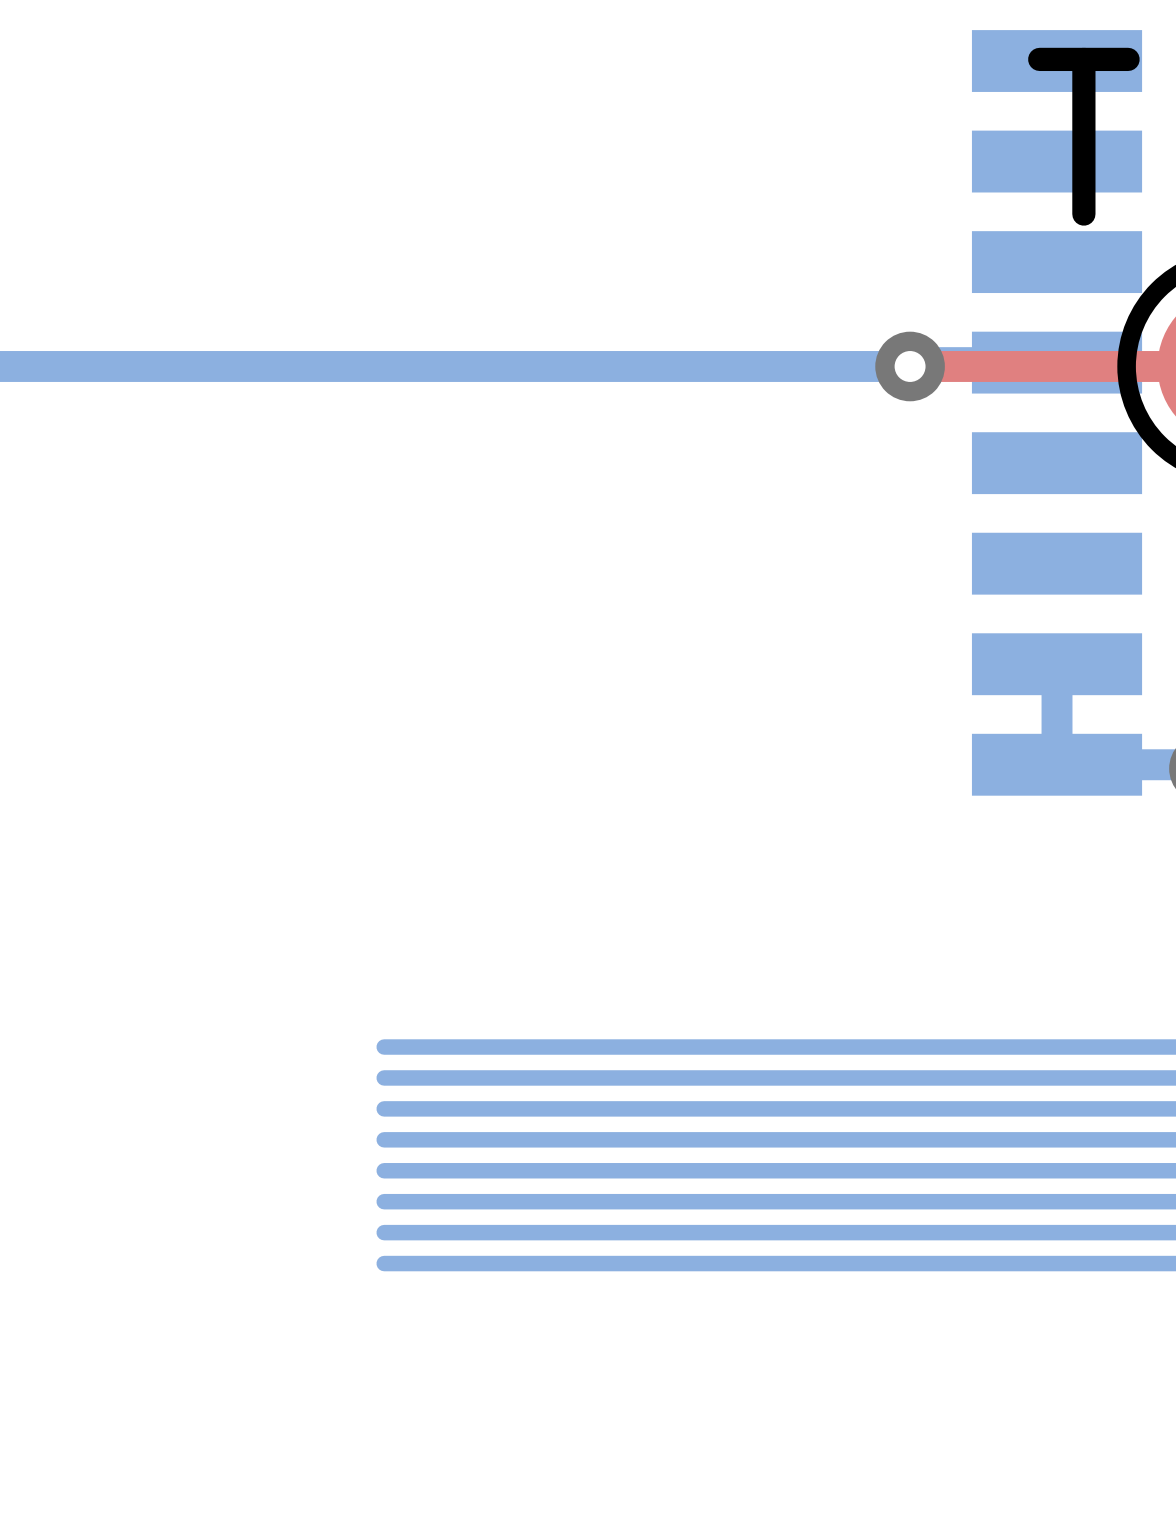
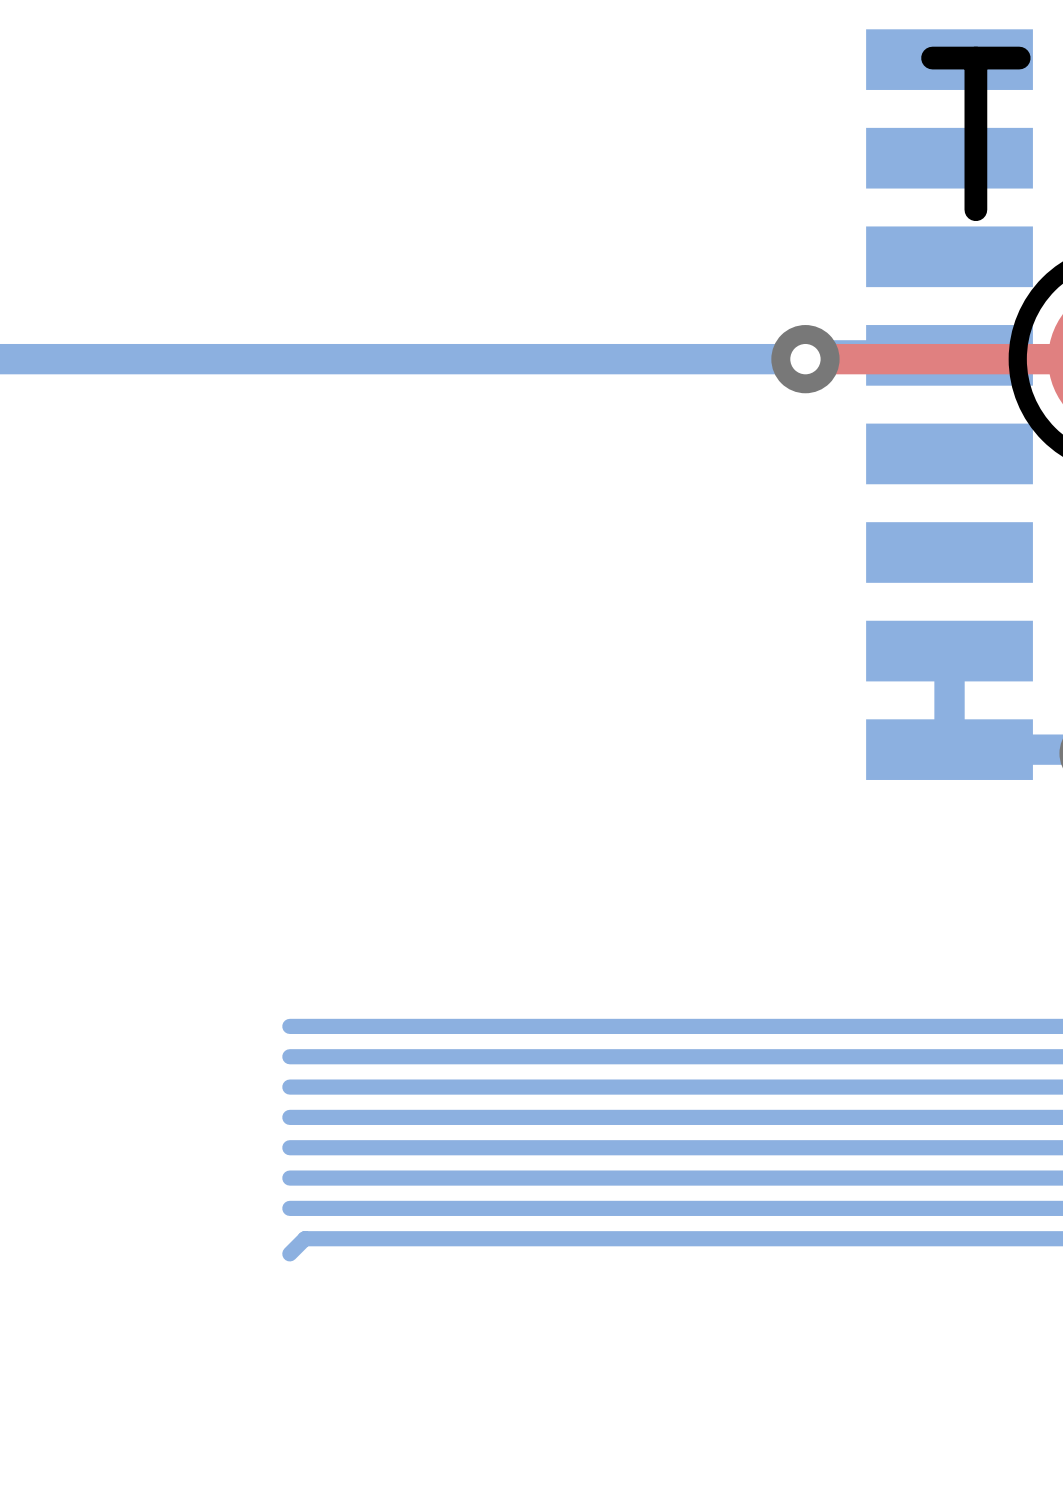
bottom track: (384, 1263) (399, 1263) -> (289, 1253) (305, 1238)

